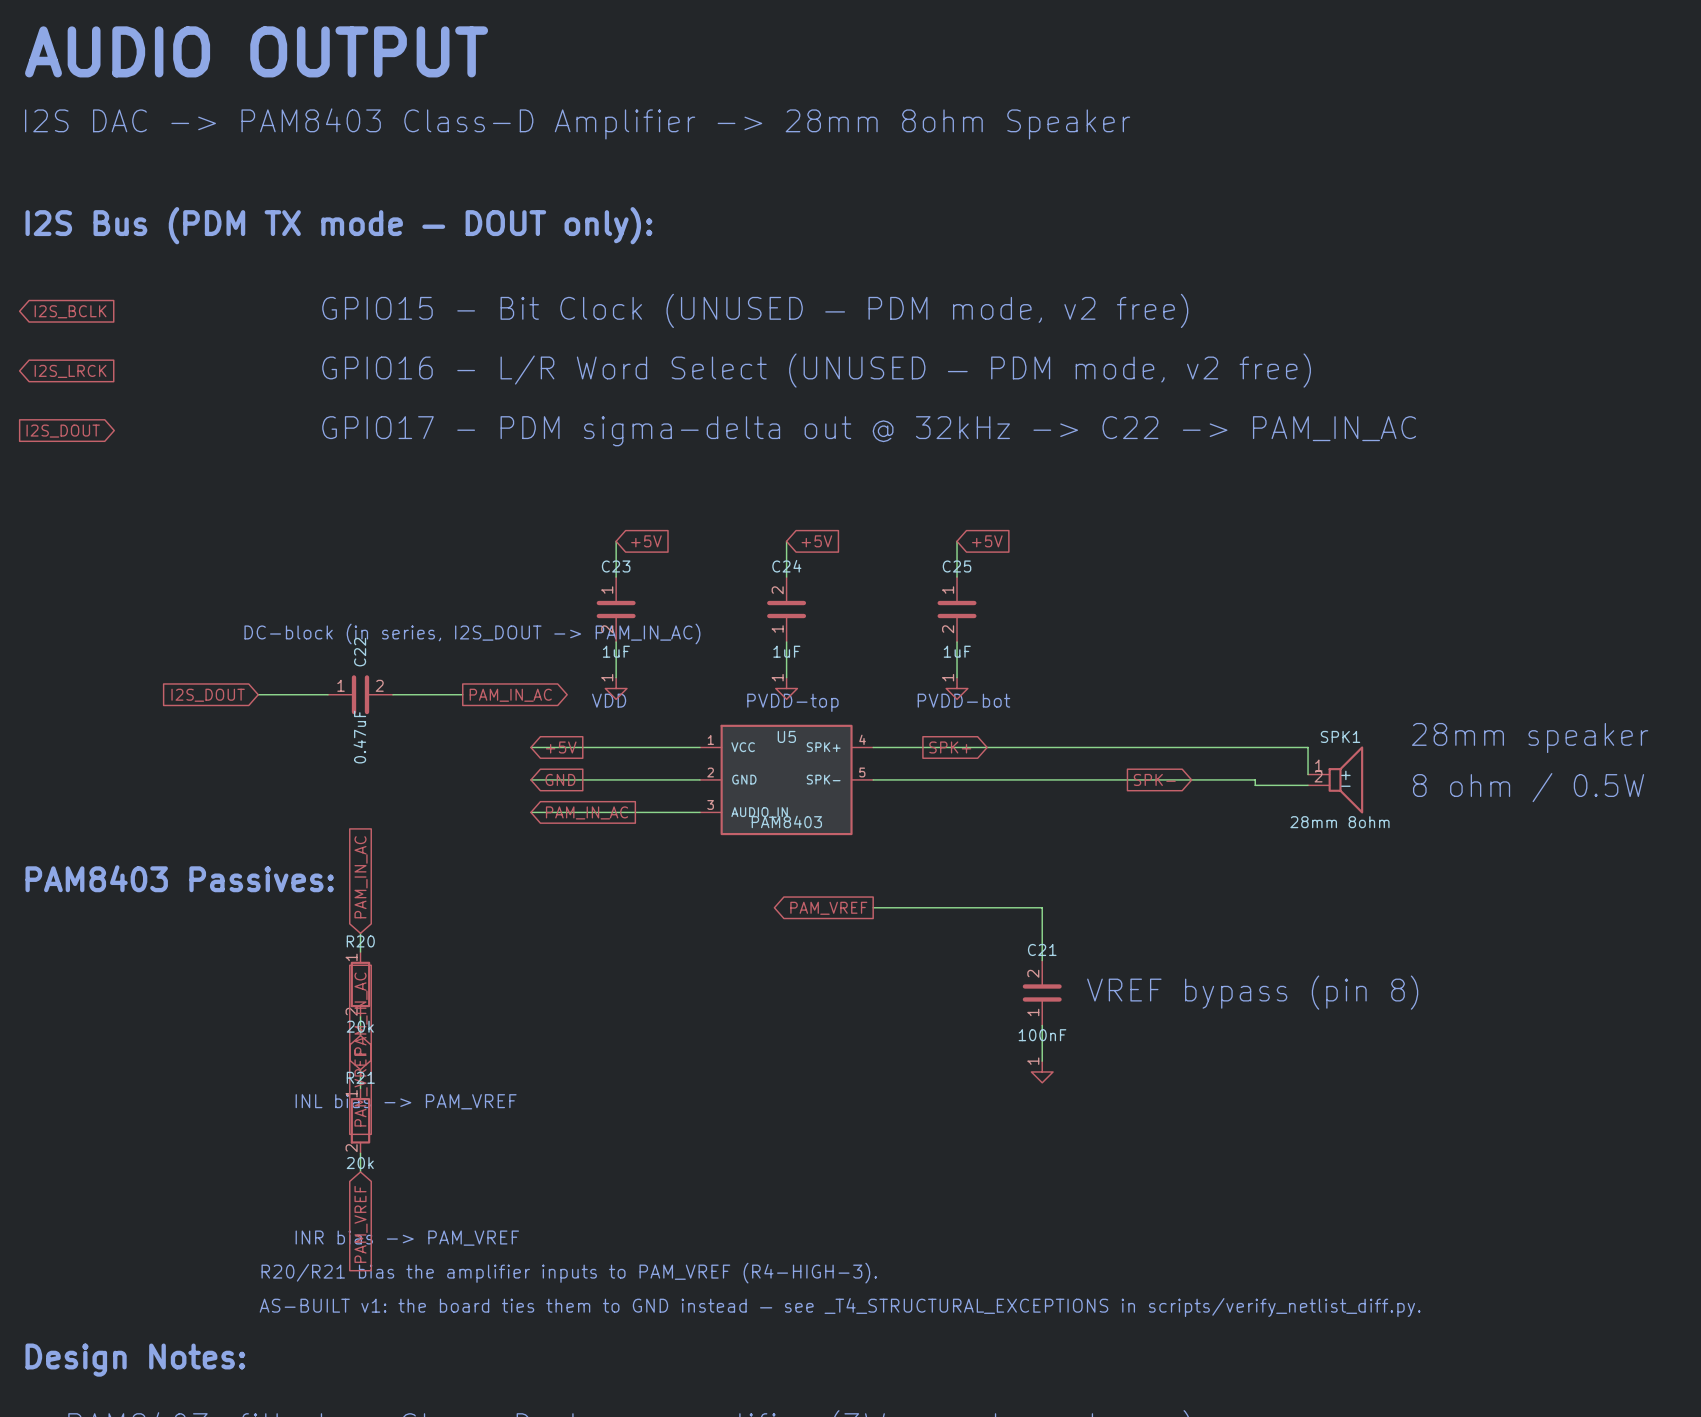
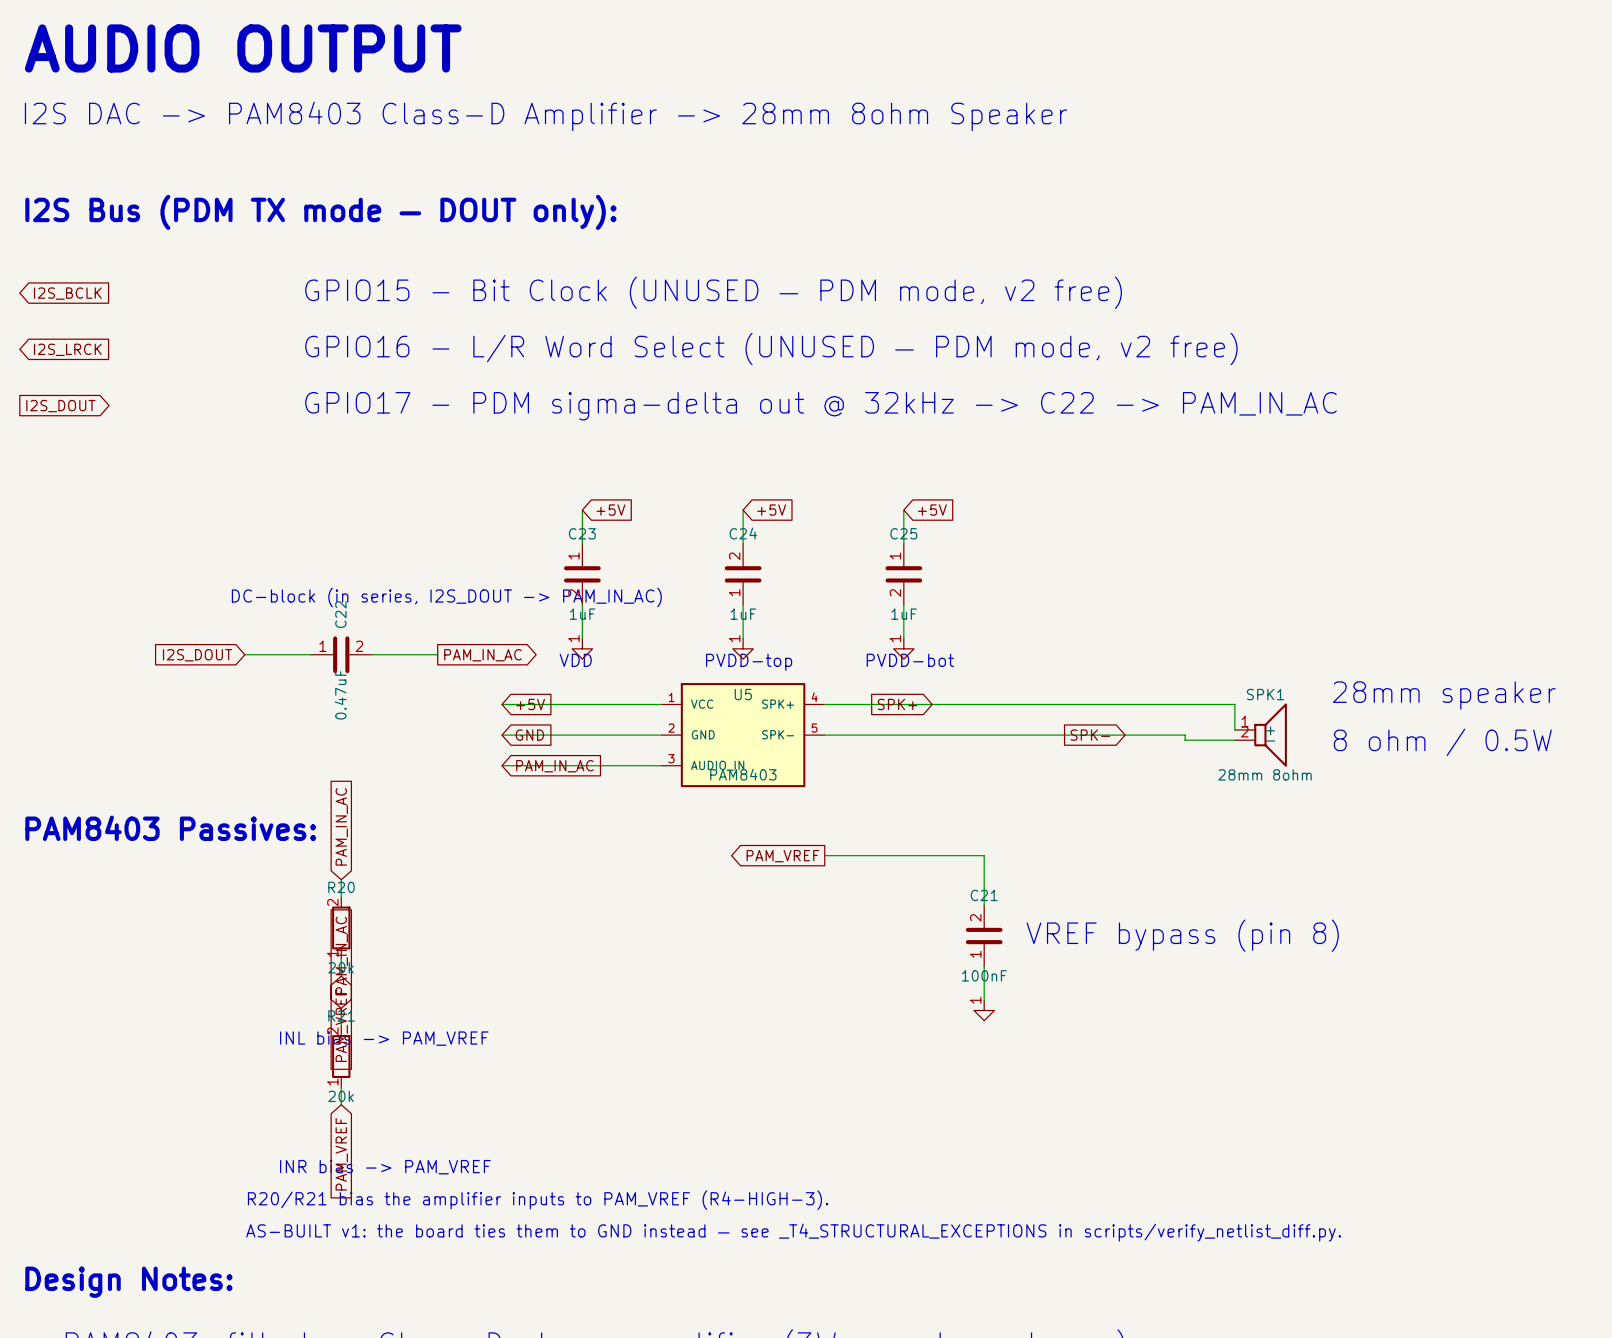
R20 rotation: 0° (360, 984) -> 180° (341, 927)
R21 rotation: 0° (360, 1120) -> 180° (341, 1056)

